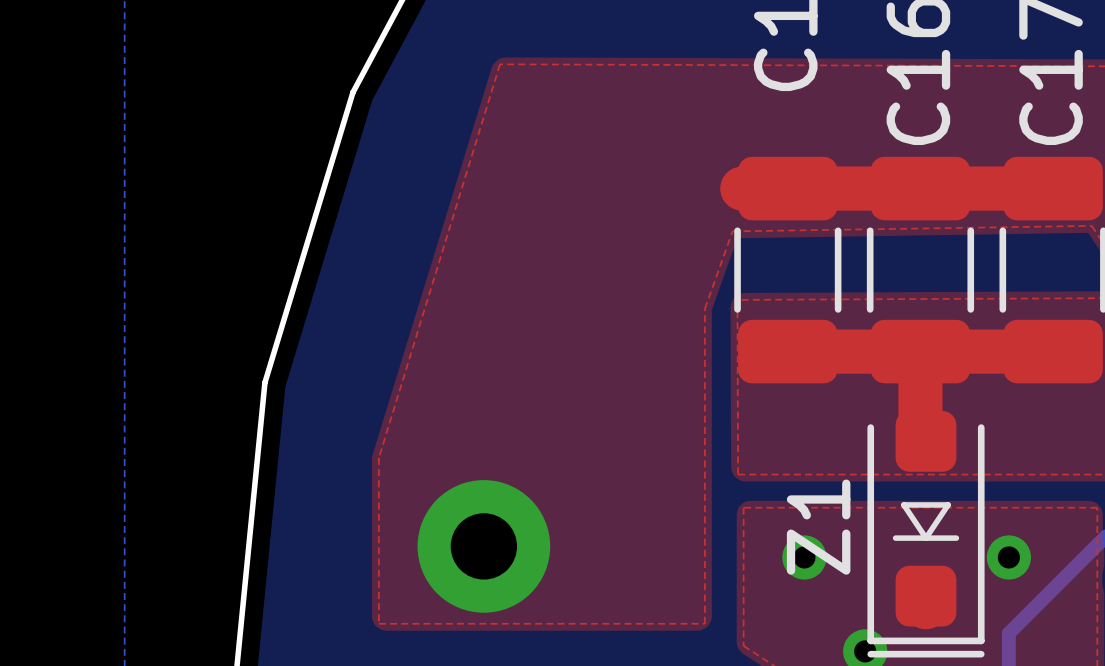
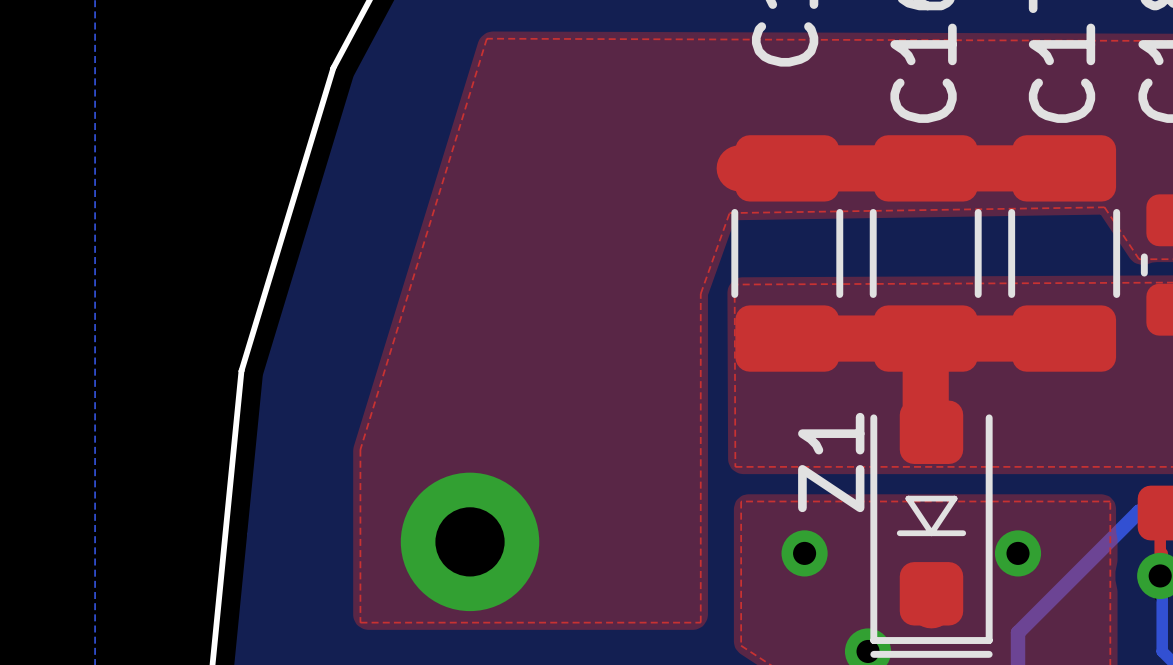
Z1 name position: Z1 (818, 527) -> Z1 (831, 462)

